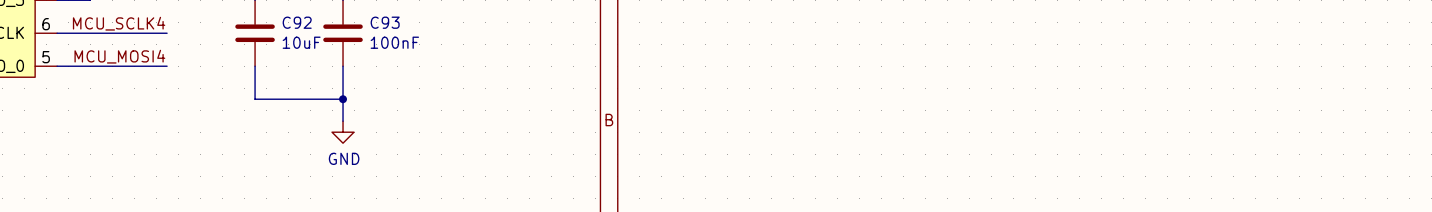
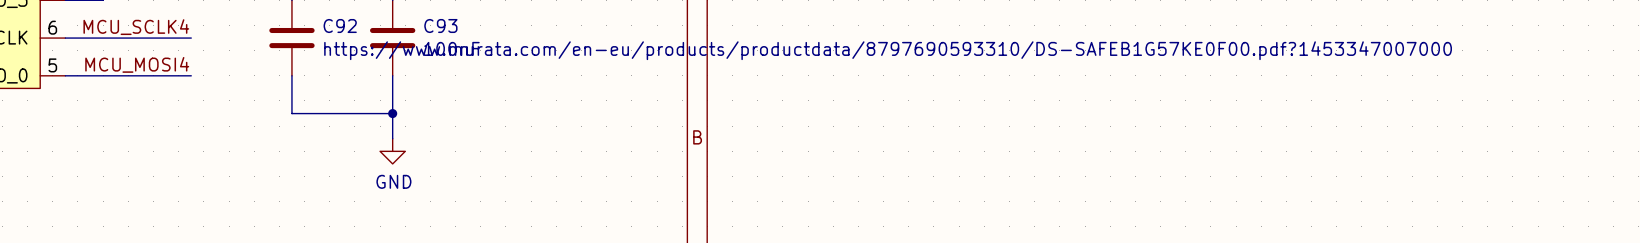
C92 value: 10uF (301, 42) -> https://www.murata.com/en-eu/products/productdata/8797690593310/DS-SAFEB1G57KE0F00.pdf?1453347007000 (888, 50)

